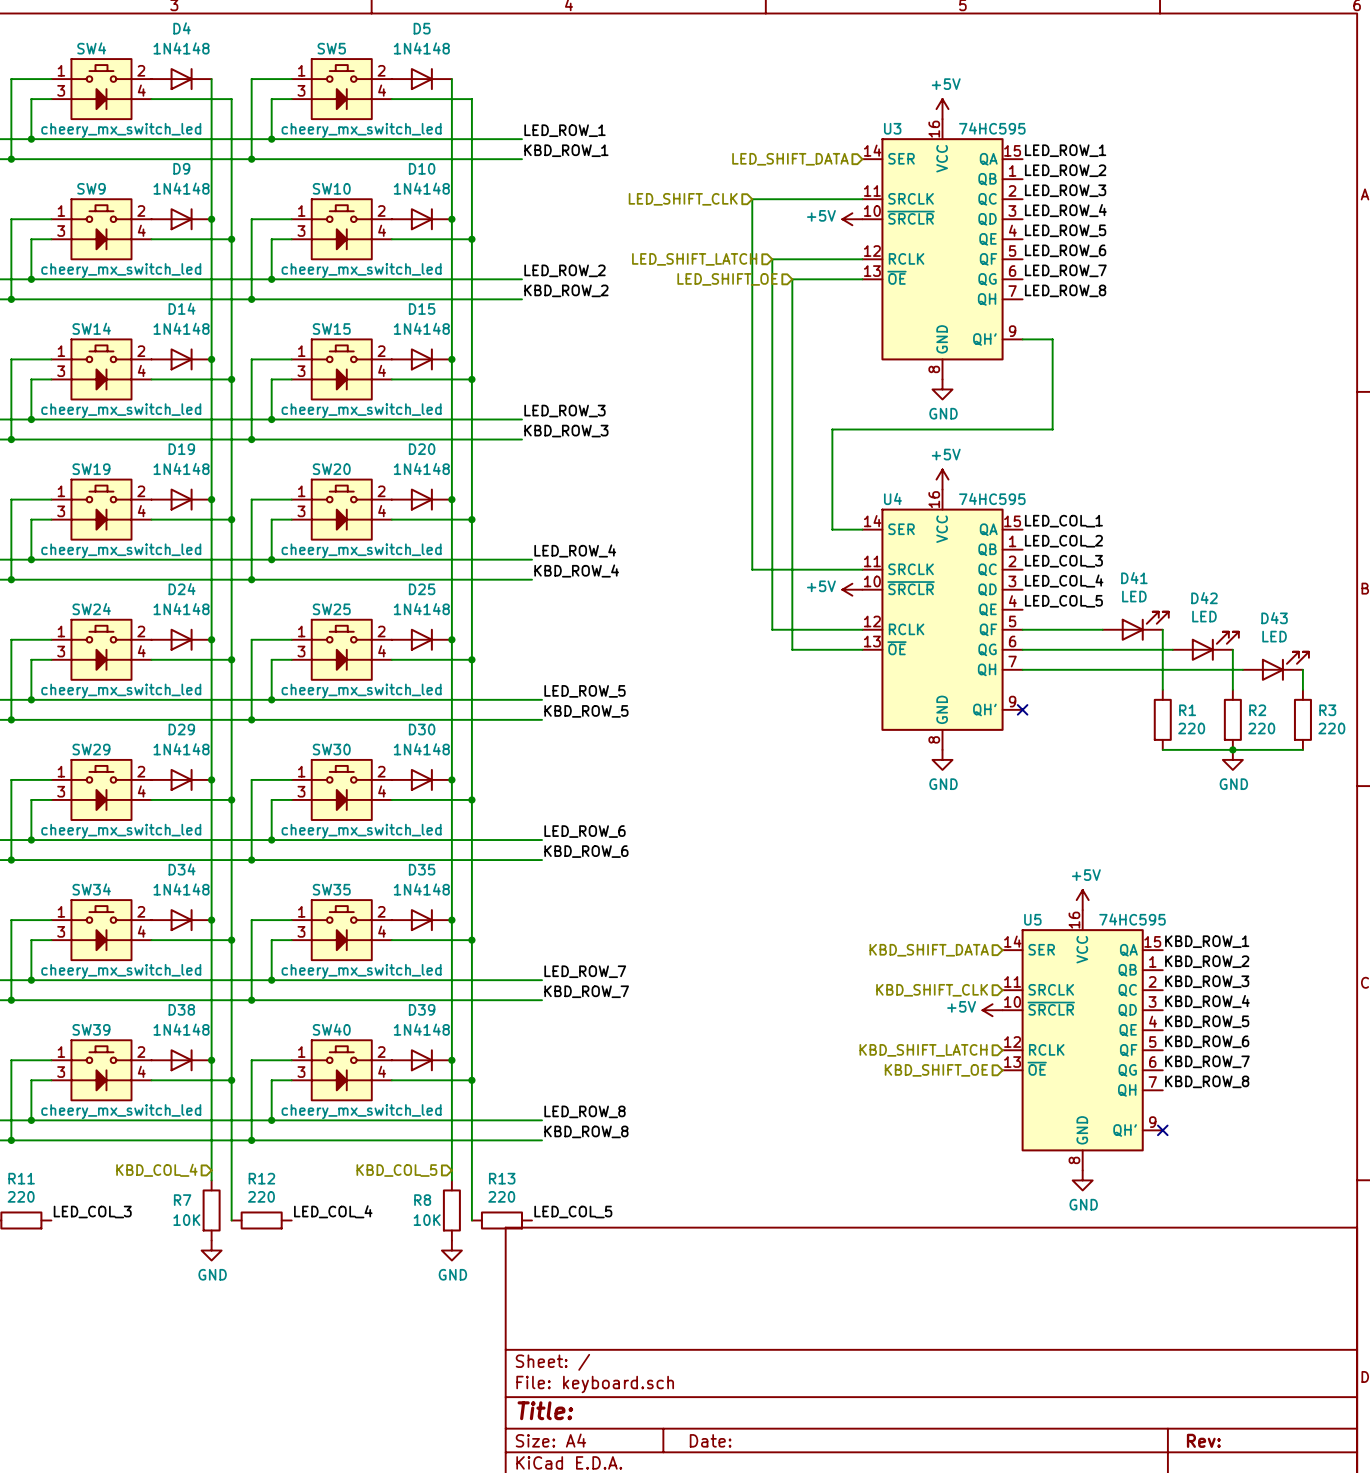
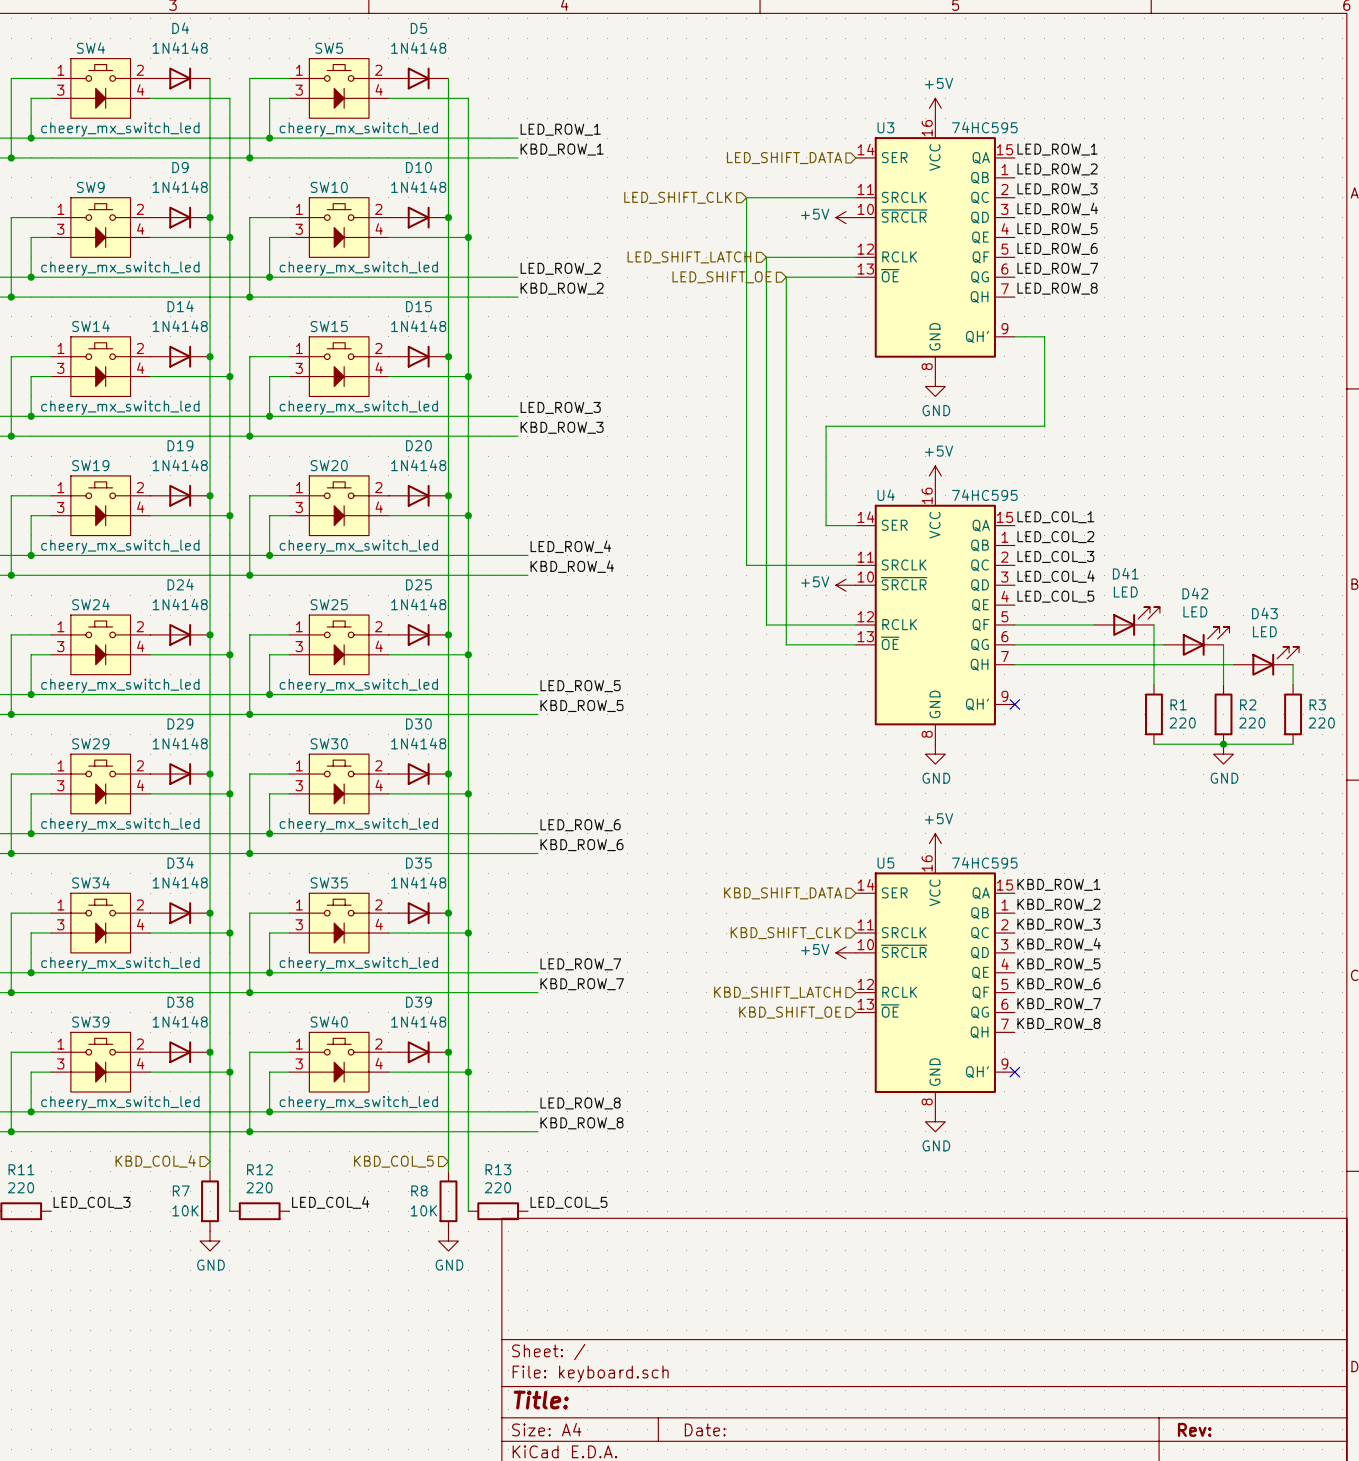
power symbol: none -> +5V (935, 843)
power symbol: +5V (1082, 900) -> none
label position: KBD_ROW_1 (1207, 941) -> KBD_ROW_1 (1058, 884)
hierarchical label position: KBD_SHIFT_DATA (929, 950) -> KBD_SHIFT_DATA (783, 893)
power symbol: none -> +5V (845, 952)
label position: KBD_ROW_2 (1207, 961) -> KBD_ROW_2 (1058, 904)
label position: KBD_ROW_3 (1207, 981) -> KBD_ROW_3 (1058, 924)
hierarchical label position: KBD_SHIFT_CLK (932, 990) -> KBD_SHIFT_CLK (785, 933)
label position: KBD_ROW_4 (1207, 1001) -> KBD_ROW_4 (1059, 944)
power symbol: +5V (992, 1010) -> none
label position: KBD_ROW_5 (1207, 1021) -> KBD_ROW_5 (1058, 964)
U5 position: (1082, 1040) -> (935, 982)
label position: KBD_ROW_6 (1207, 1041) -> KBD_ROW_6 (1058, 984)
hierarchical label position: KBD_SHIFT_LATCH (923, 1050) -> KBD_SHIFT_LATCH (777, 992)
label position: KBD_ROW_7 (1207, 1061) -> KBD_ROW_7 (1059, 1004)
hierarchical label position: KBD_SHIFT_OE (936, 1070) -> KBD_SHIFT_OE (790, 1012)
no-connect mark: none -> (1014, 1072)
label position: KBD_ROW_8 (1207, 1081) -> KBD_ROW_8 (1058, 1023)
no-connect mark: (1162, 1130) -> none
power symbol position: GND (1082, 1180) -> GND (935, 1121)

